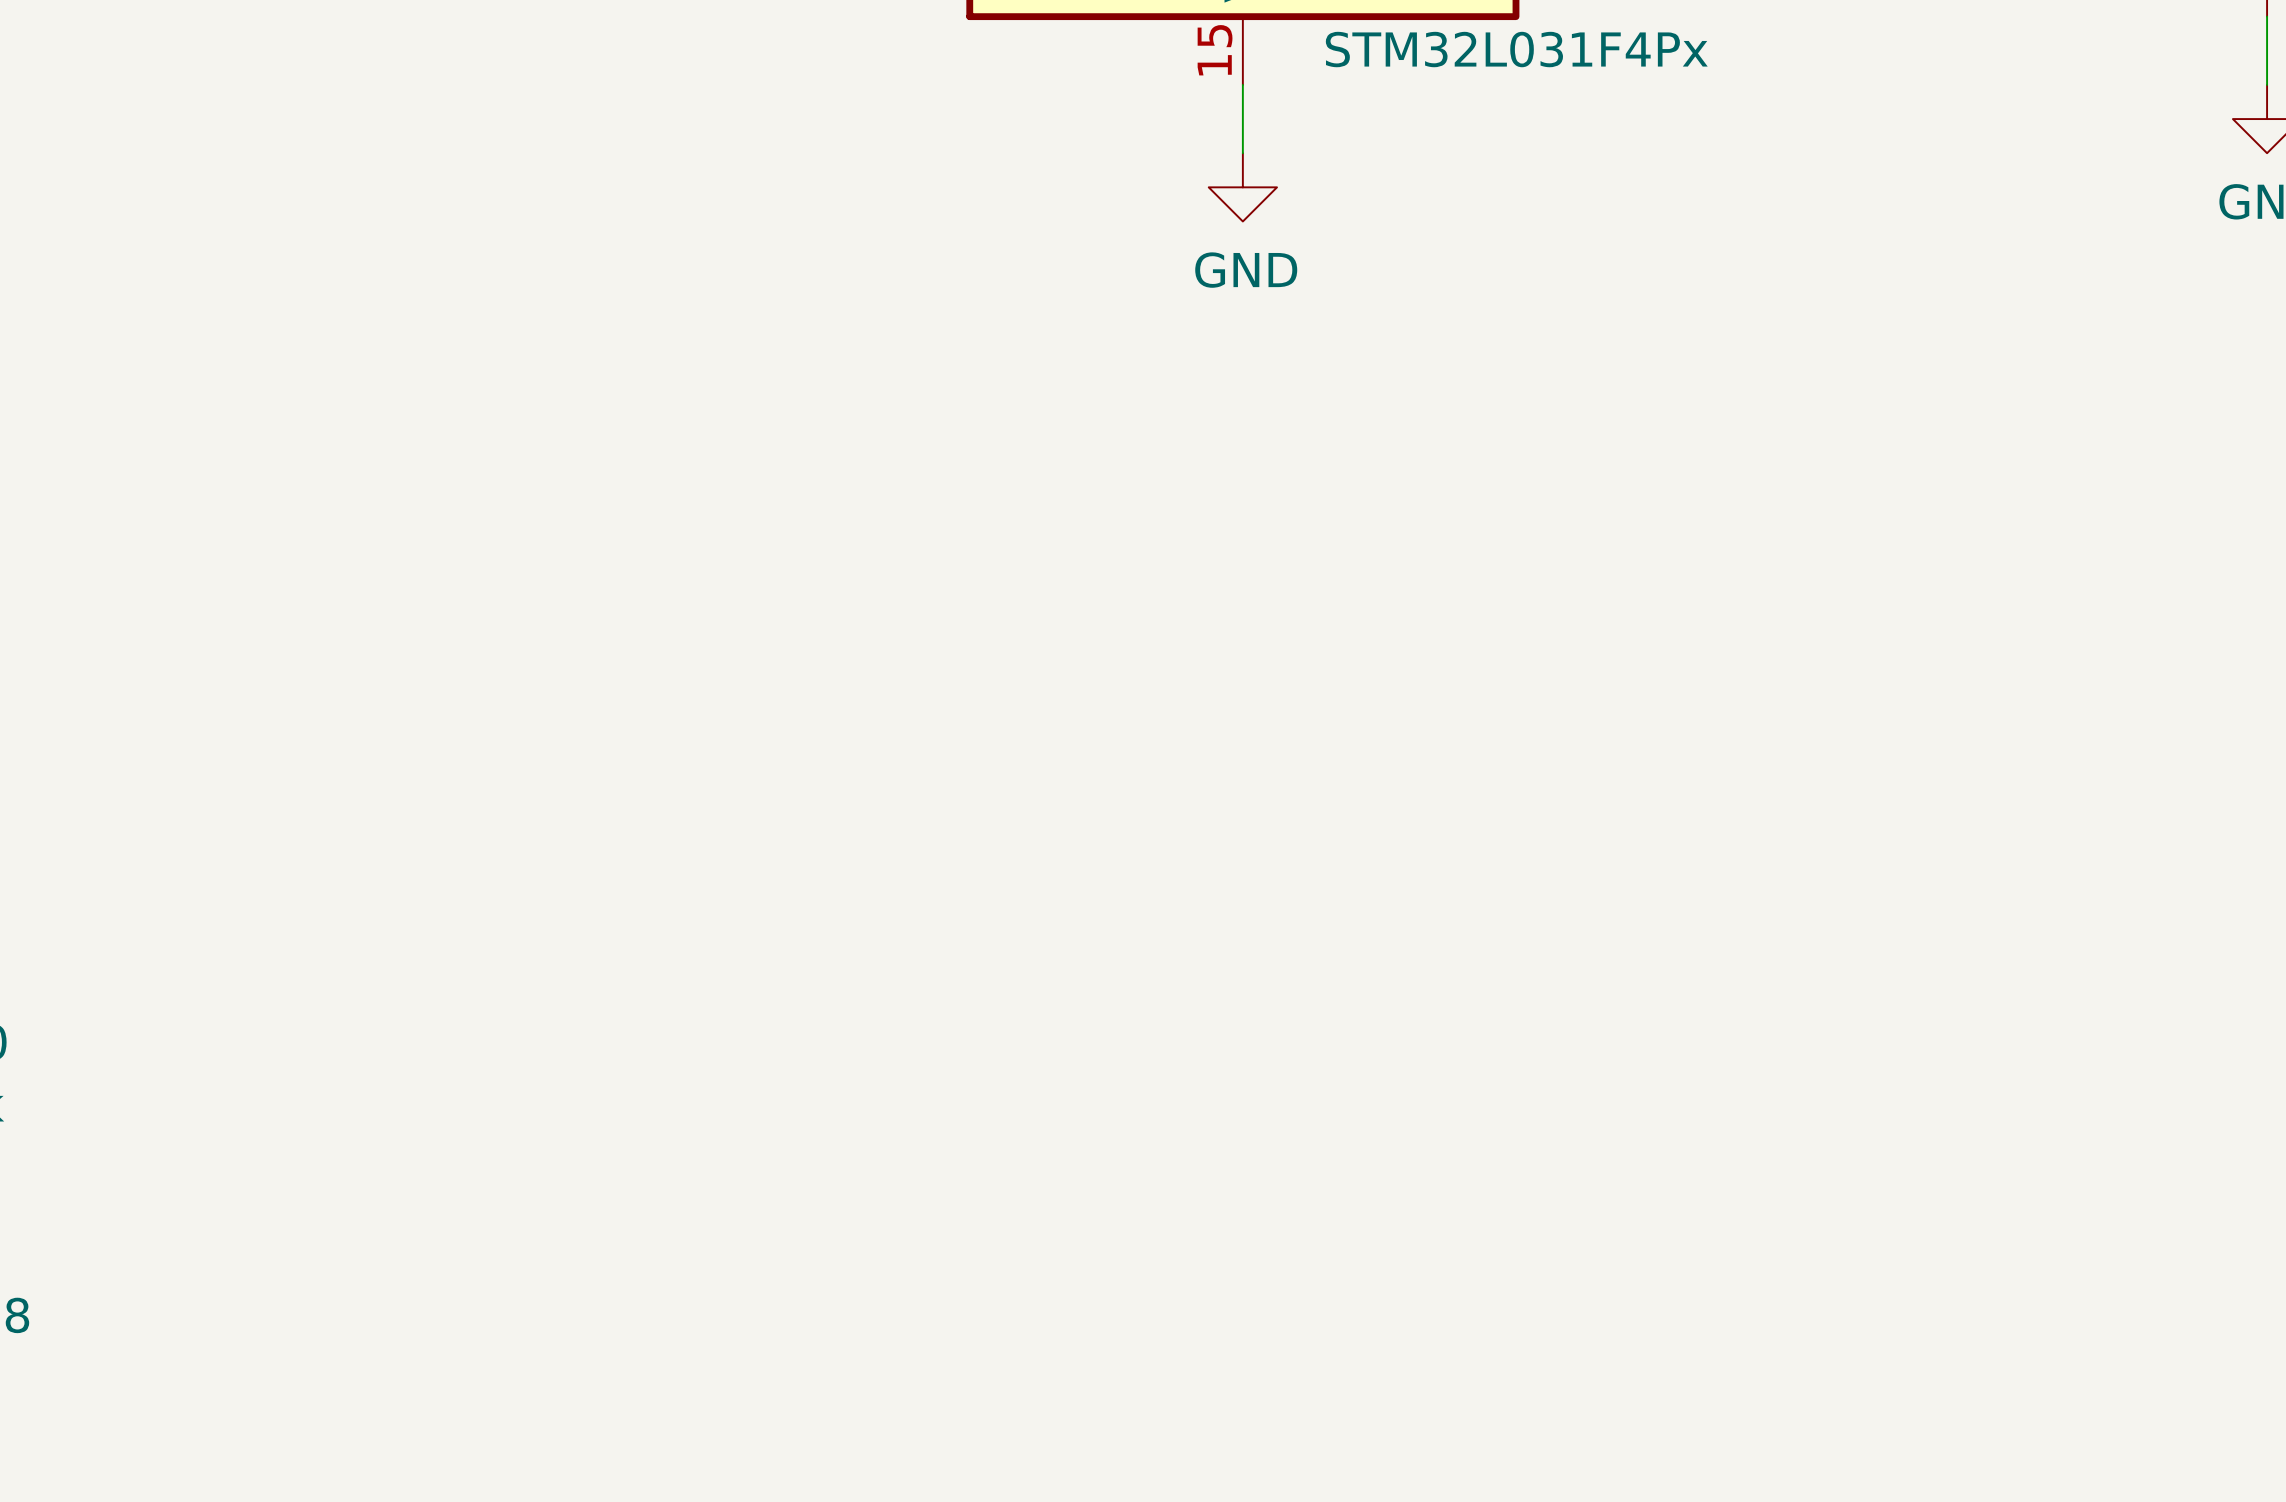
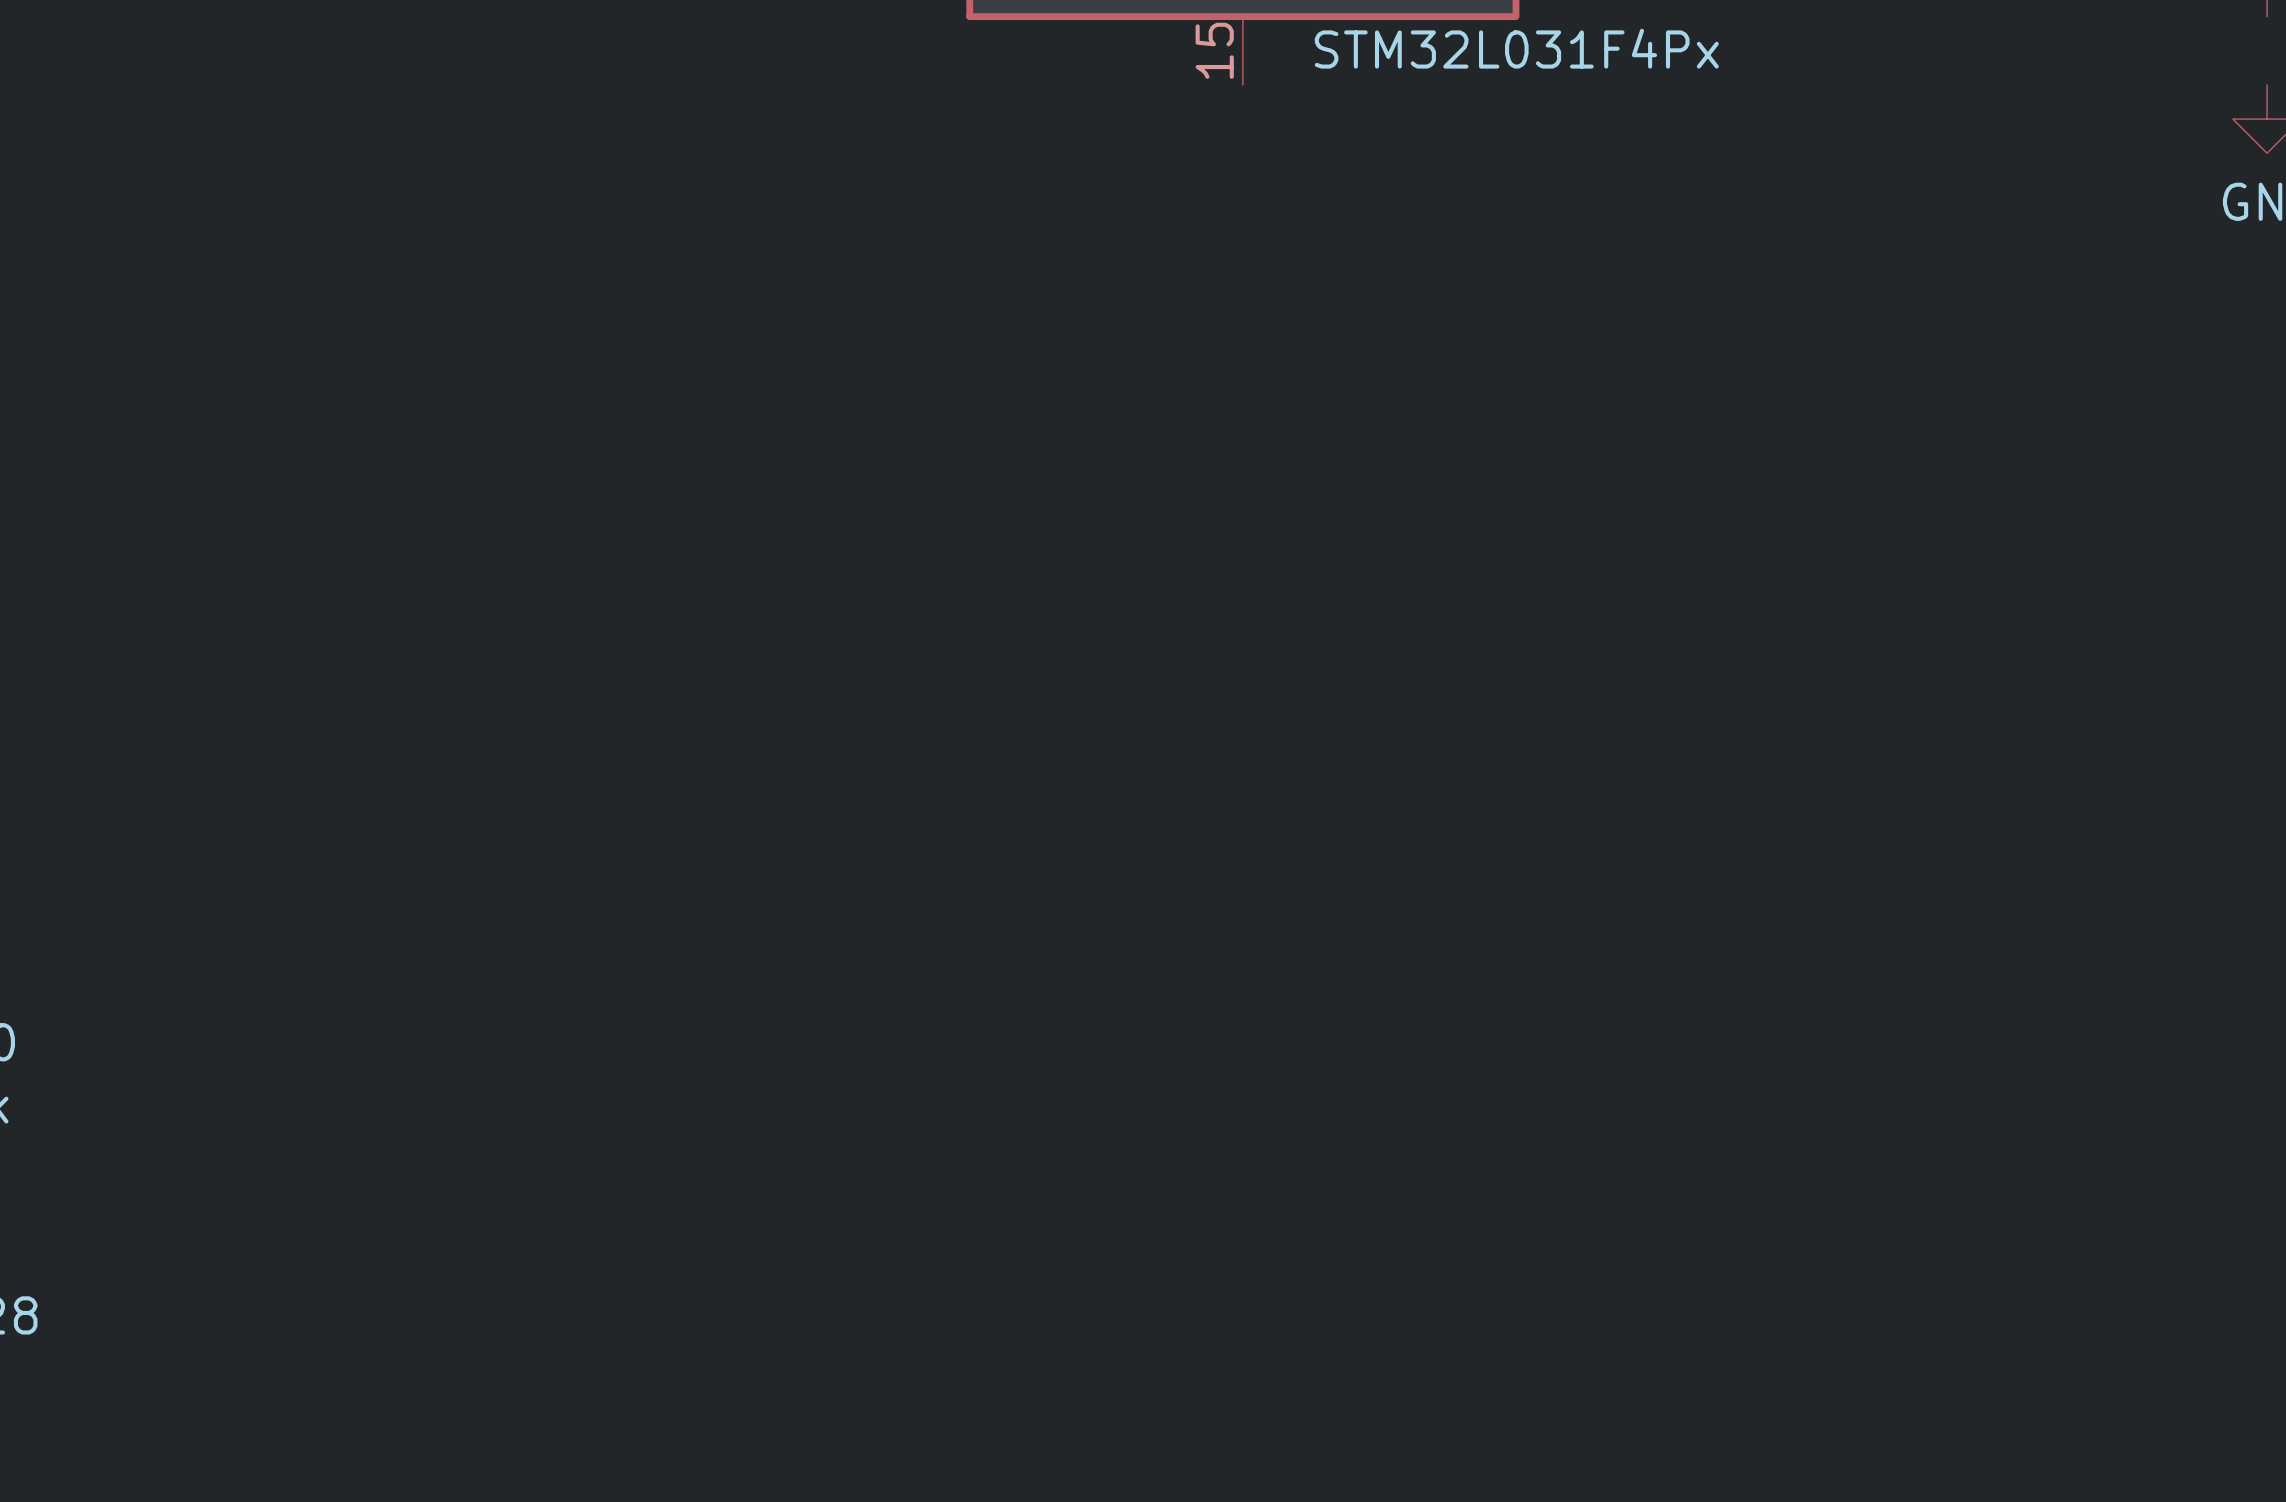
wire: (2267, 16) (2267, 84) -> none
wire: (1242, 84) (1242, 153) -> none
power symbol: GND (1242, 187) -> none

